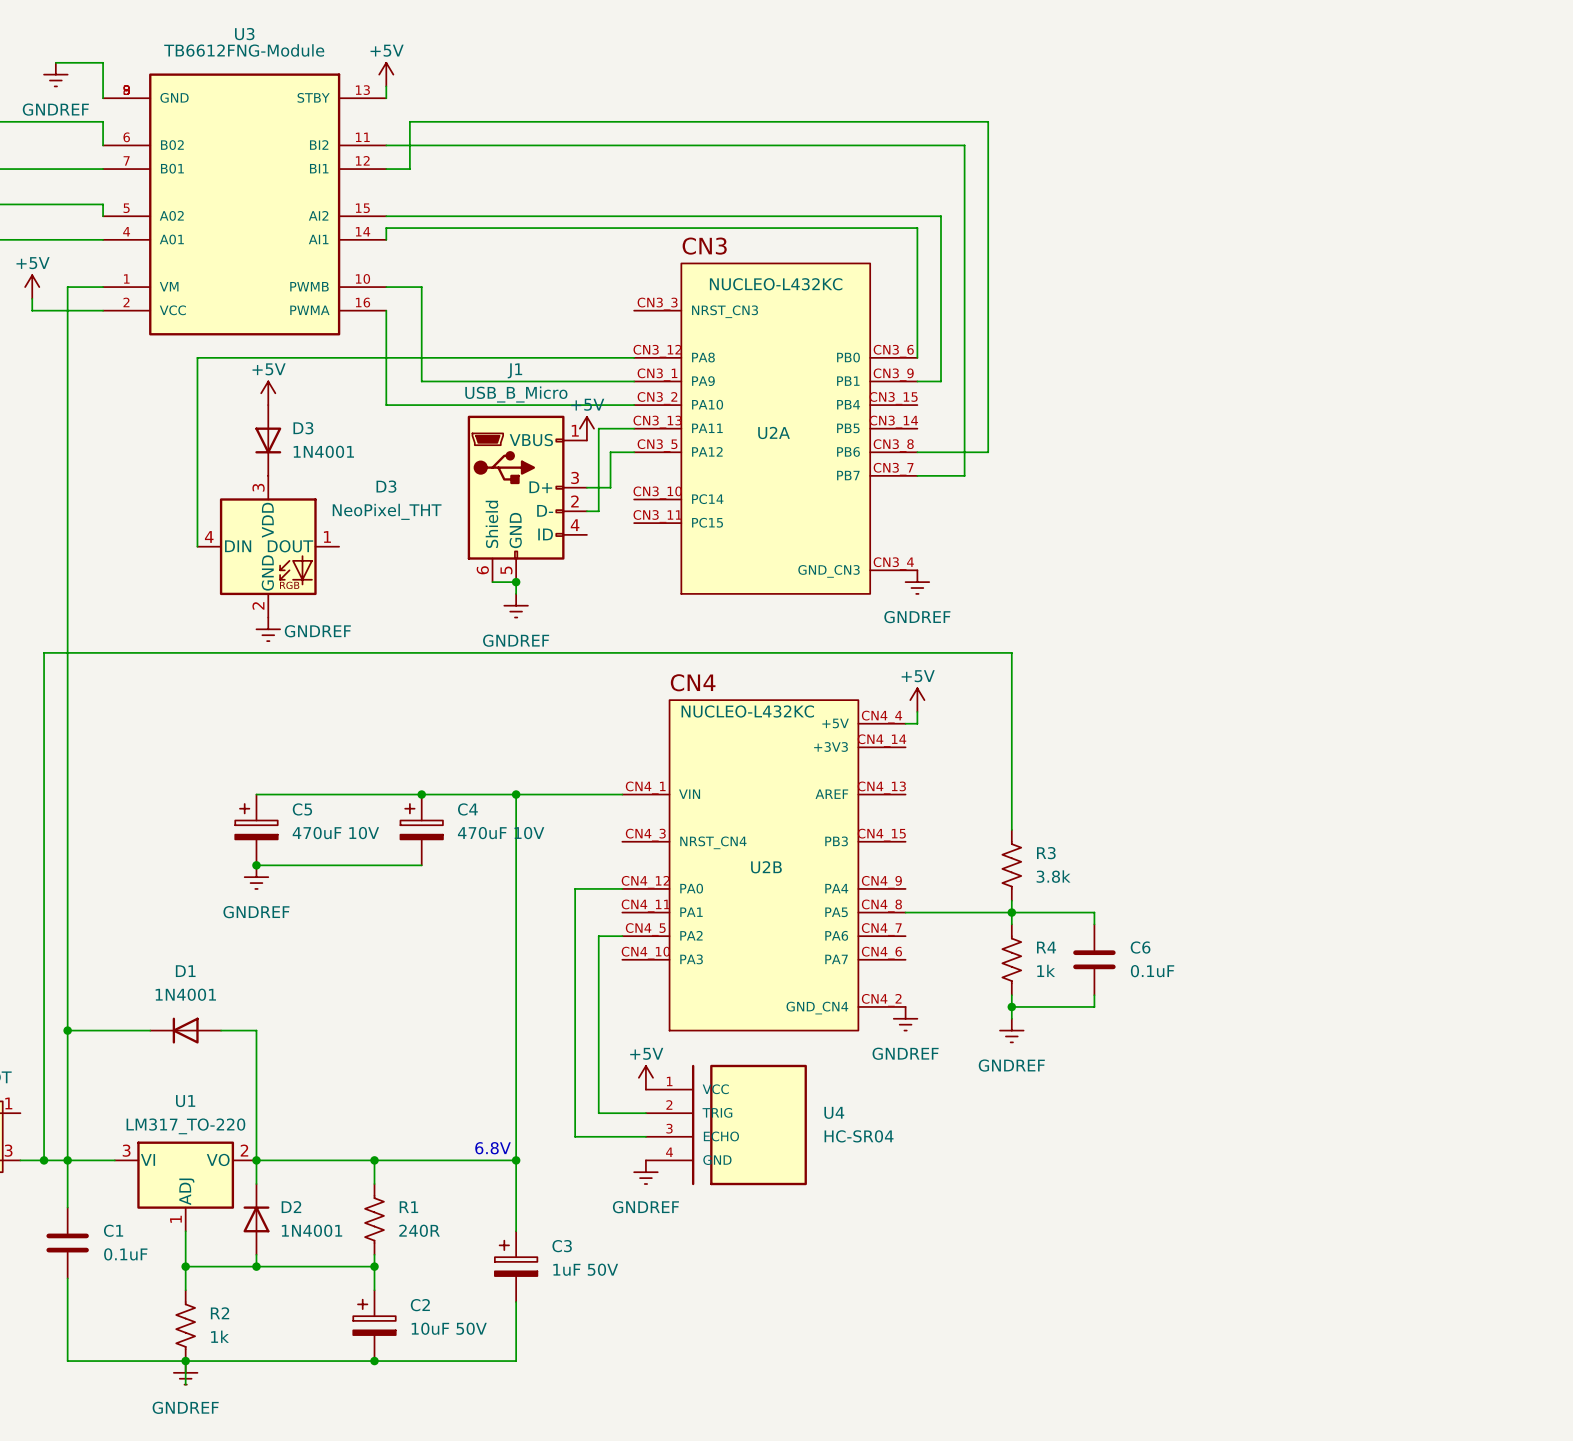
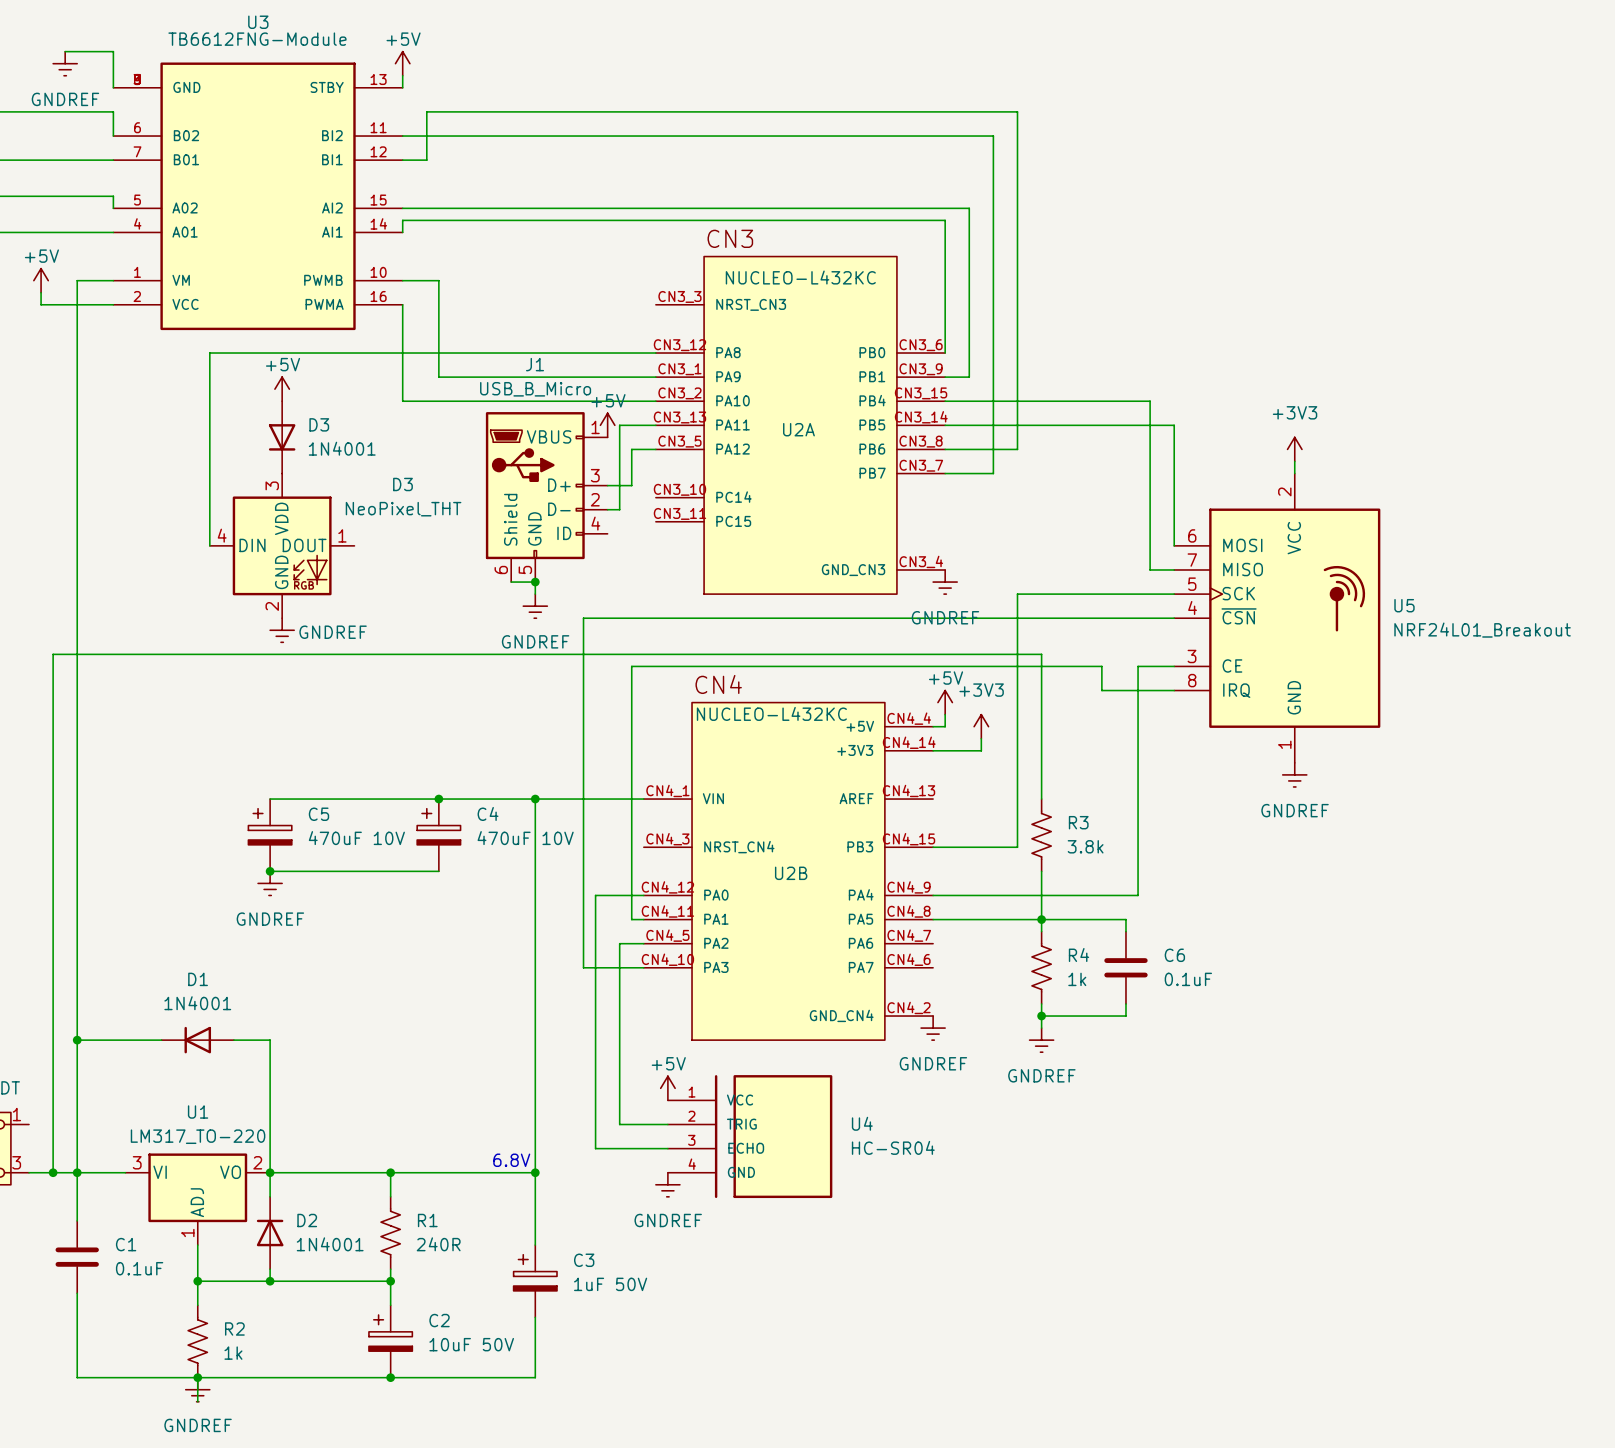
wire: none -> (945, 401) (1150, 401) (1150, 569) (1174, 569)
wire: none -> (945, 425) (1174, 425) (1174, 545)
power symbol: none -> +3V3 (1294, 449)
wire: none -> (1294, 461) (1294, 473)
wire: none -> (1174, 594) (1017, 594) (1017, 847) (933, 847)
wire: none -> (1174, 618) (583, 618) (583, 967) (643, 967)
U5: none -> NRF24L01_Breakout (1277, 618)
wire: none -> (1174, 666) (1138, 666) (1138, 895) (933, 895)
wire: none -> (1174, 690) (1101, 690) (1101, 666) (631, 666) (631, 919) (643, 919)
power symbol: none -> +3V3 (981, 726)
wire: none -> (981, 738) (981, 750) (933, 750)
power symbol: none -> GNDREF (1294, 774)
R3 position: (1011, 865) -> (1041, 835)

